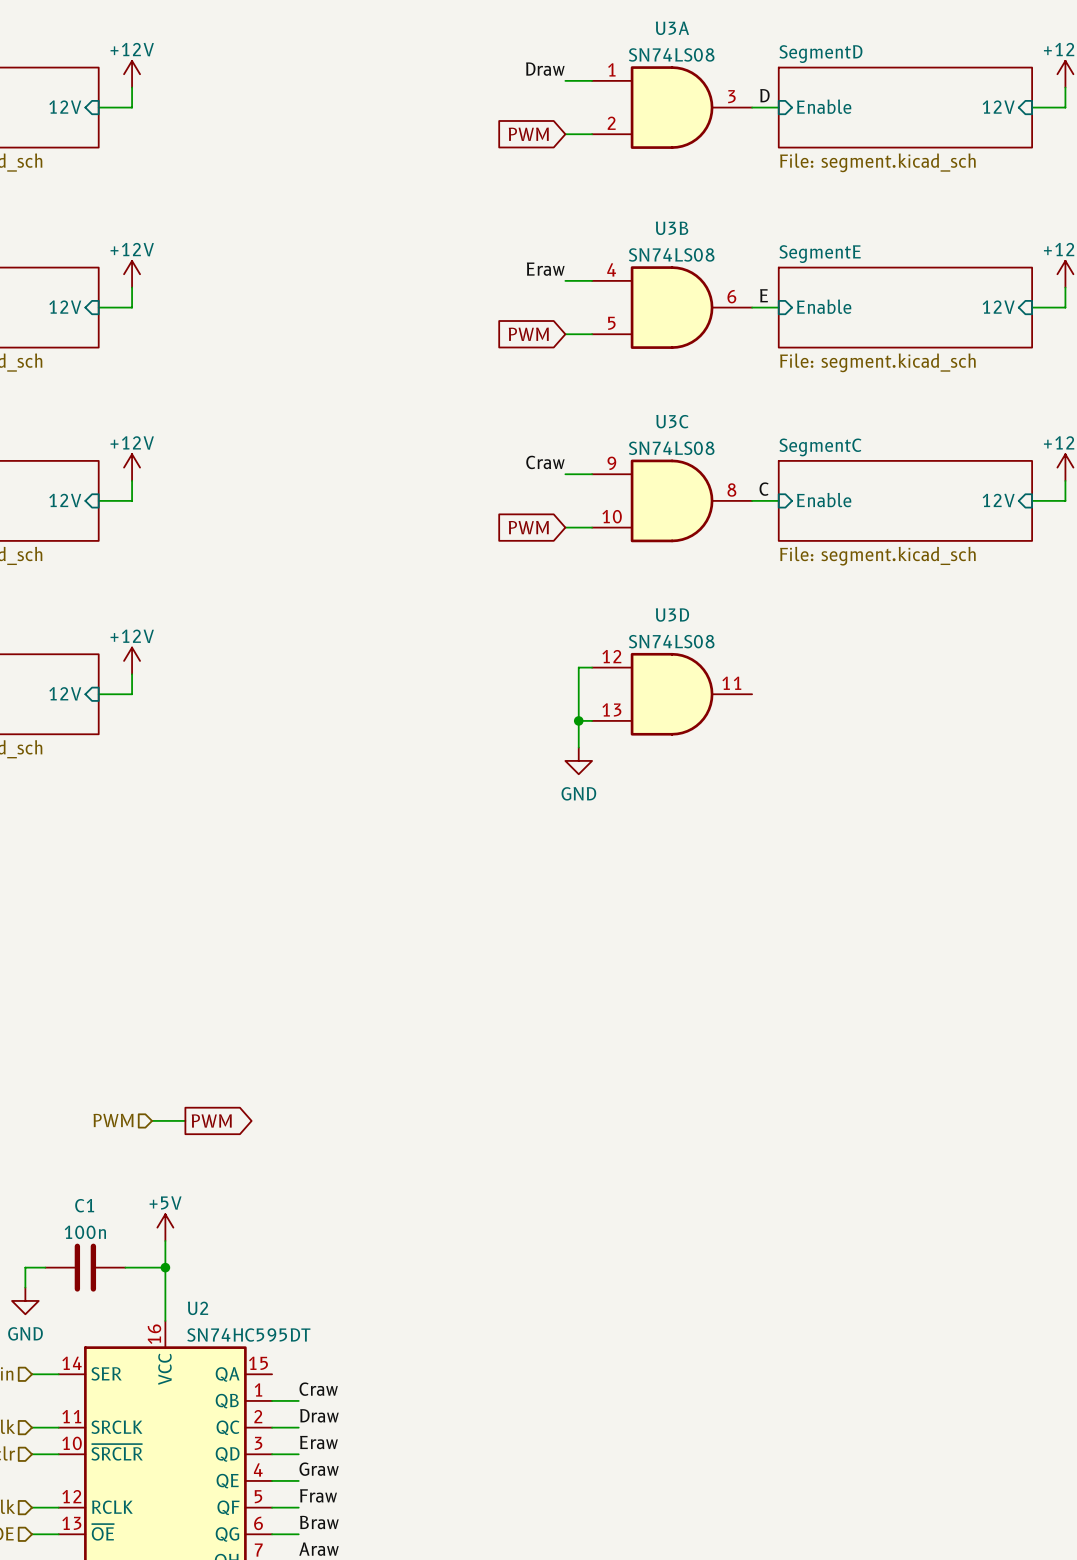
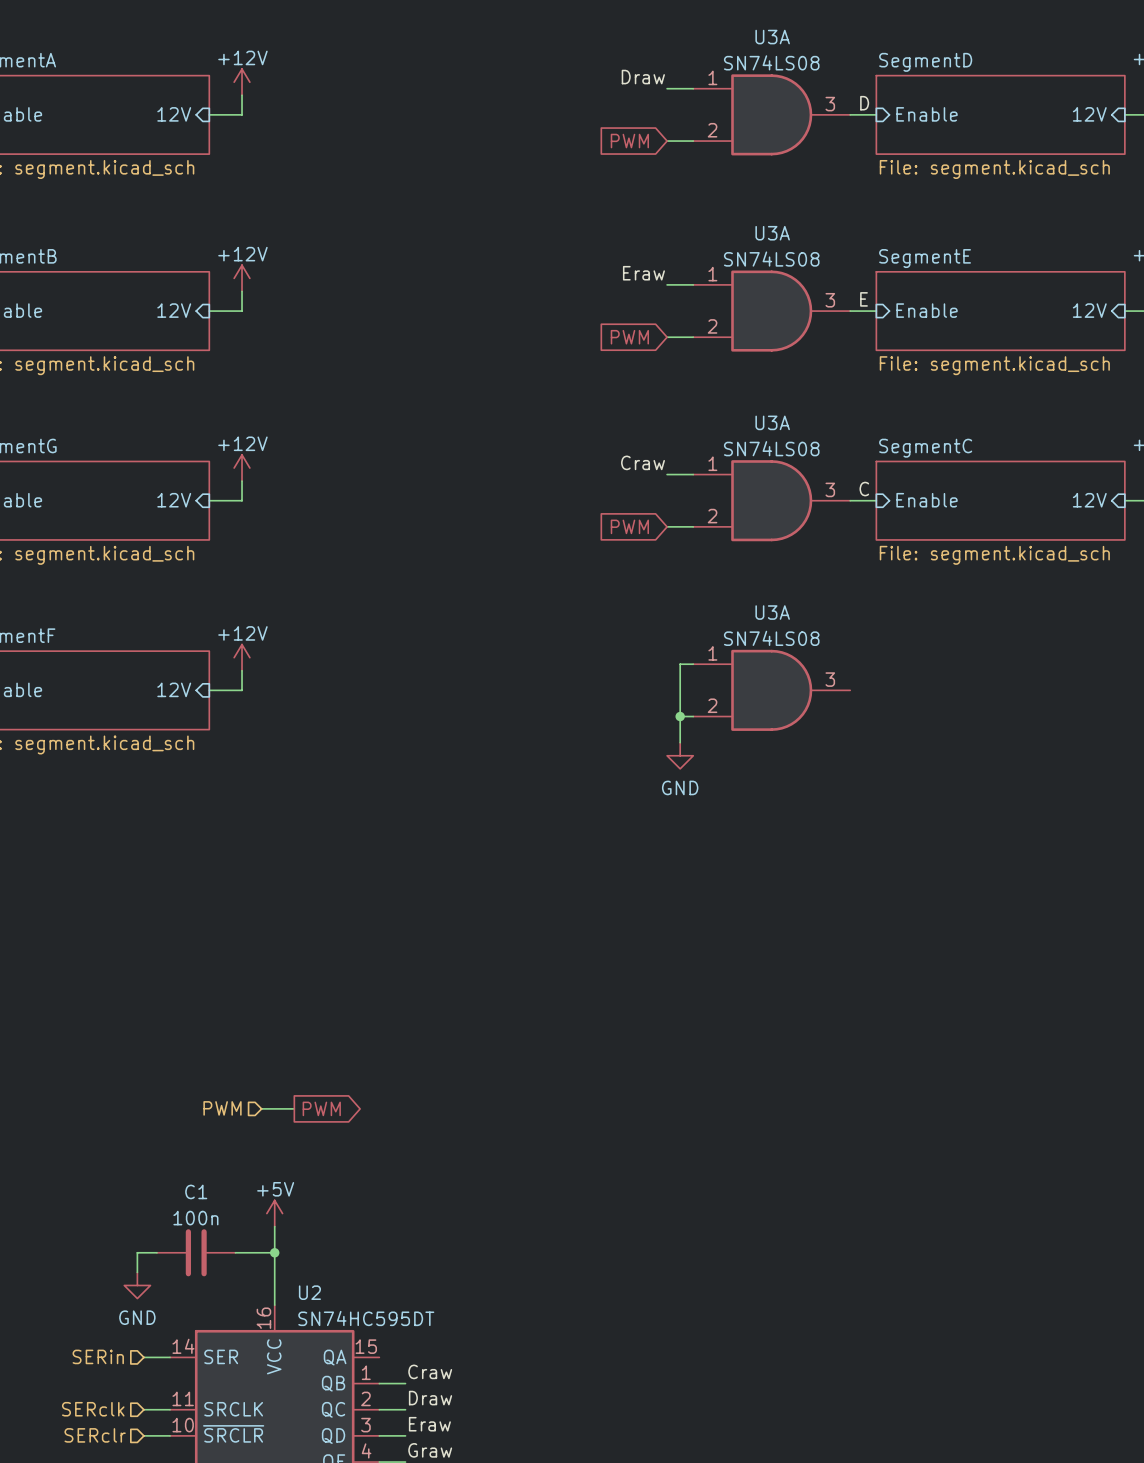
U3B name: U3B (672, 228) -> U3A (772, 233)
U3B pin number: 4 (611, 269) -> 1 (712, 274)
U3B pin number: 6 (731, 296) -> 3 (830, 300)
U3B pin number: 5 (611, 323) -> 2 (712, 326)
U3C name: U3C (672, 421) -> U3A (772, 422)
U3C pin number: 9 (611, 463) -> 1 (712, 463)
U3C pin number: 8 (731, 490) -> 3 (830, 489)
U3C pin number: 10 (612, 516) -> 2 (712, 516)
U3D name: U3D (672, 614) -> U3A (772, 612)
U3D pin number: 12 (611, 656) -> 1 (712, 653)
U3D pin number: 11 (731, 683) -> 3 (830, 679)
U3D pin number: 13 (611, 709) -> 2 (712, 705)

